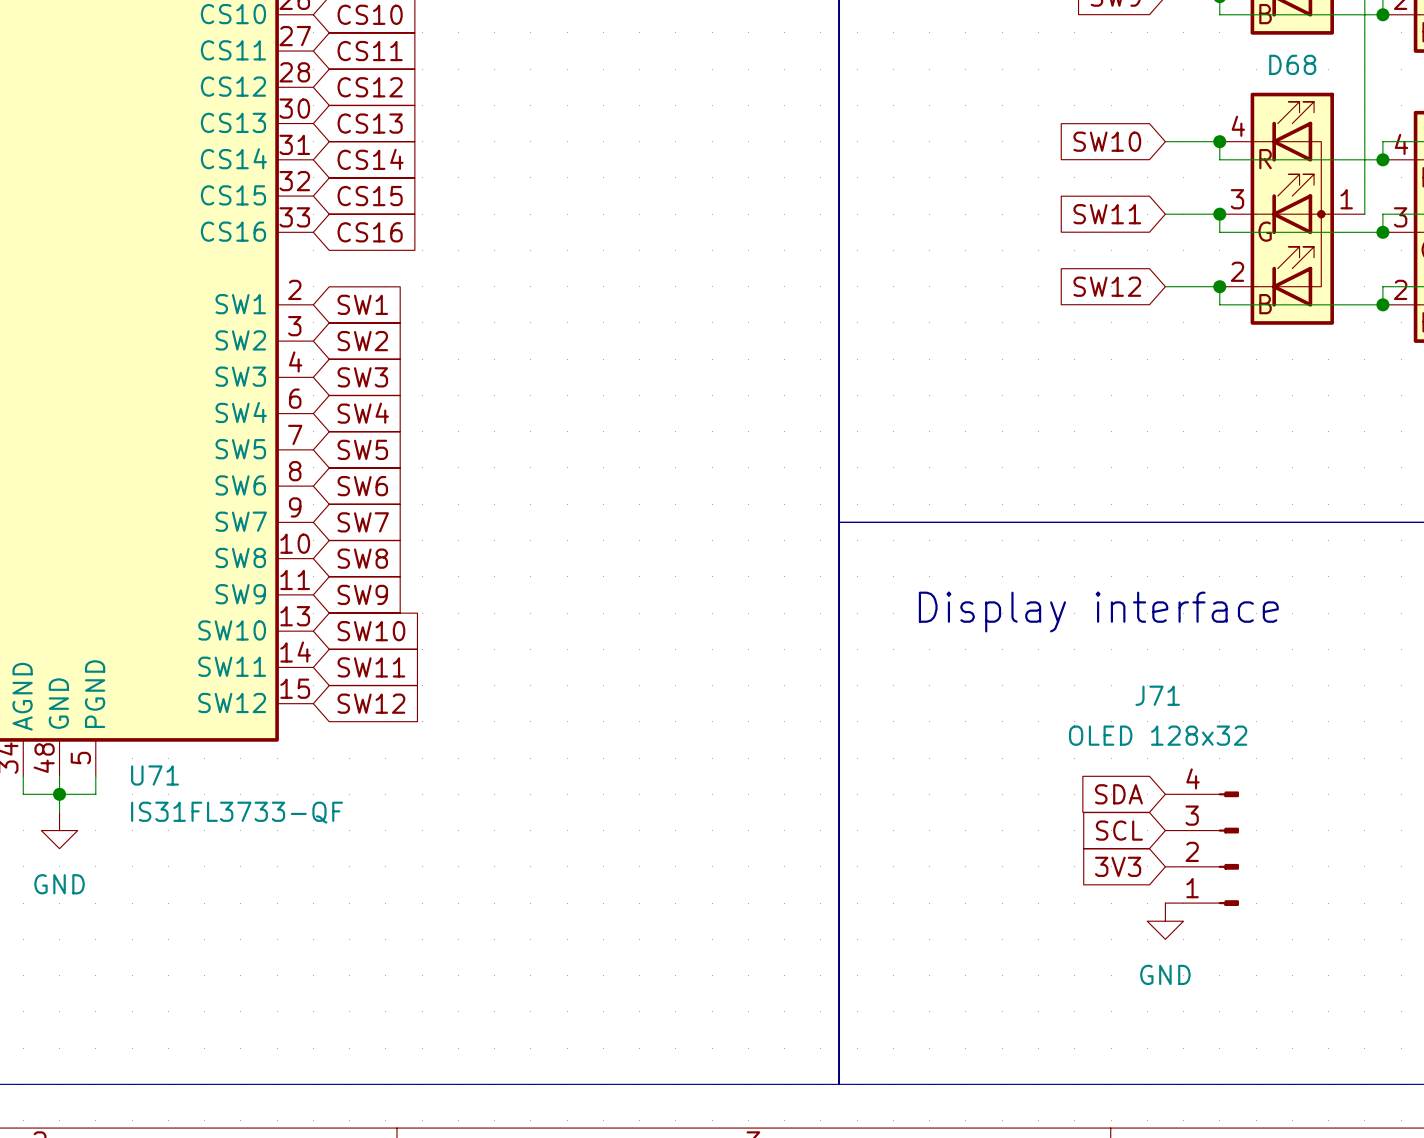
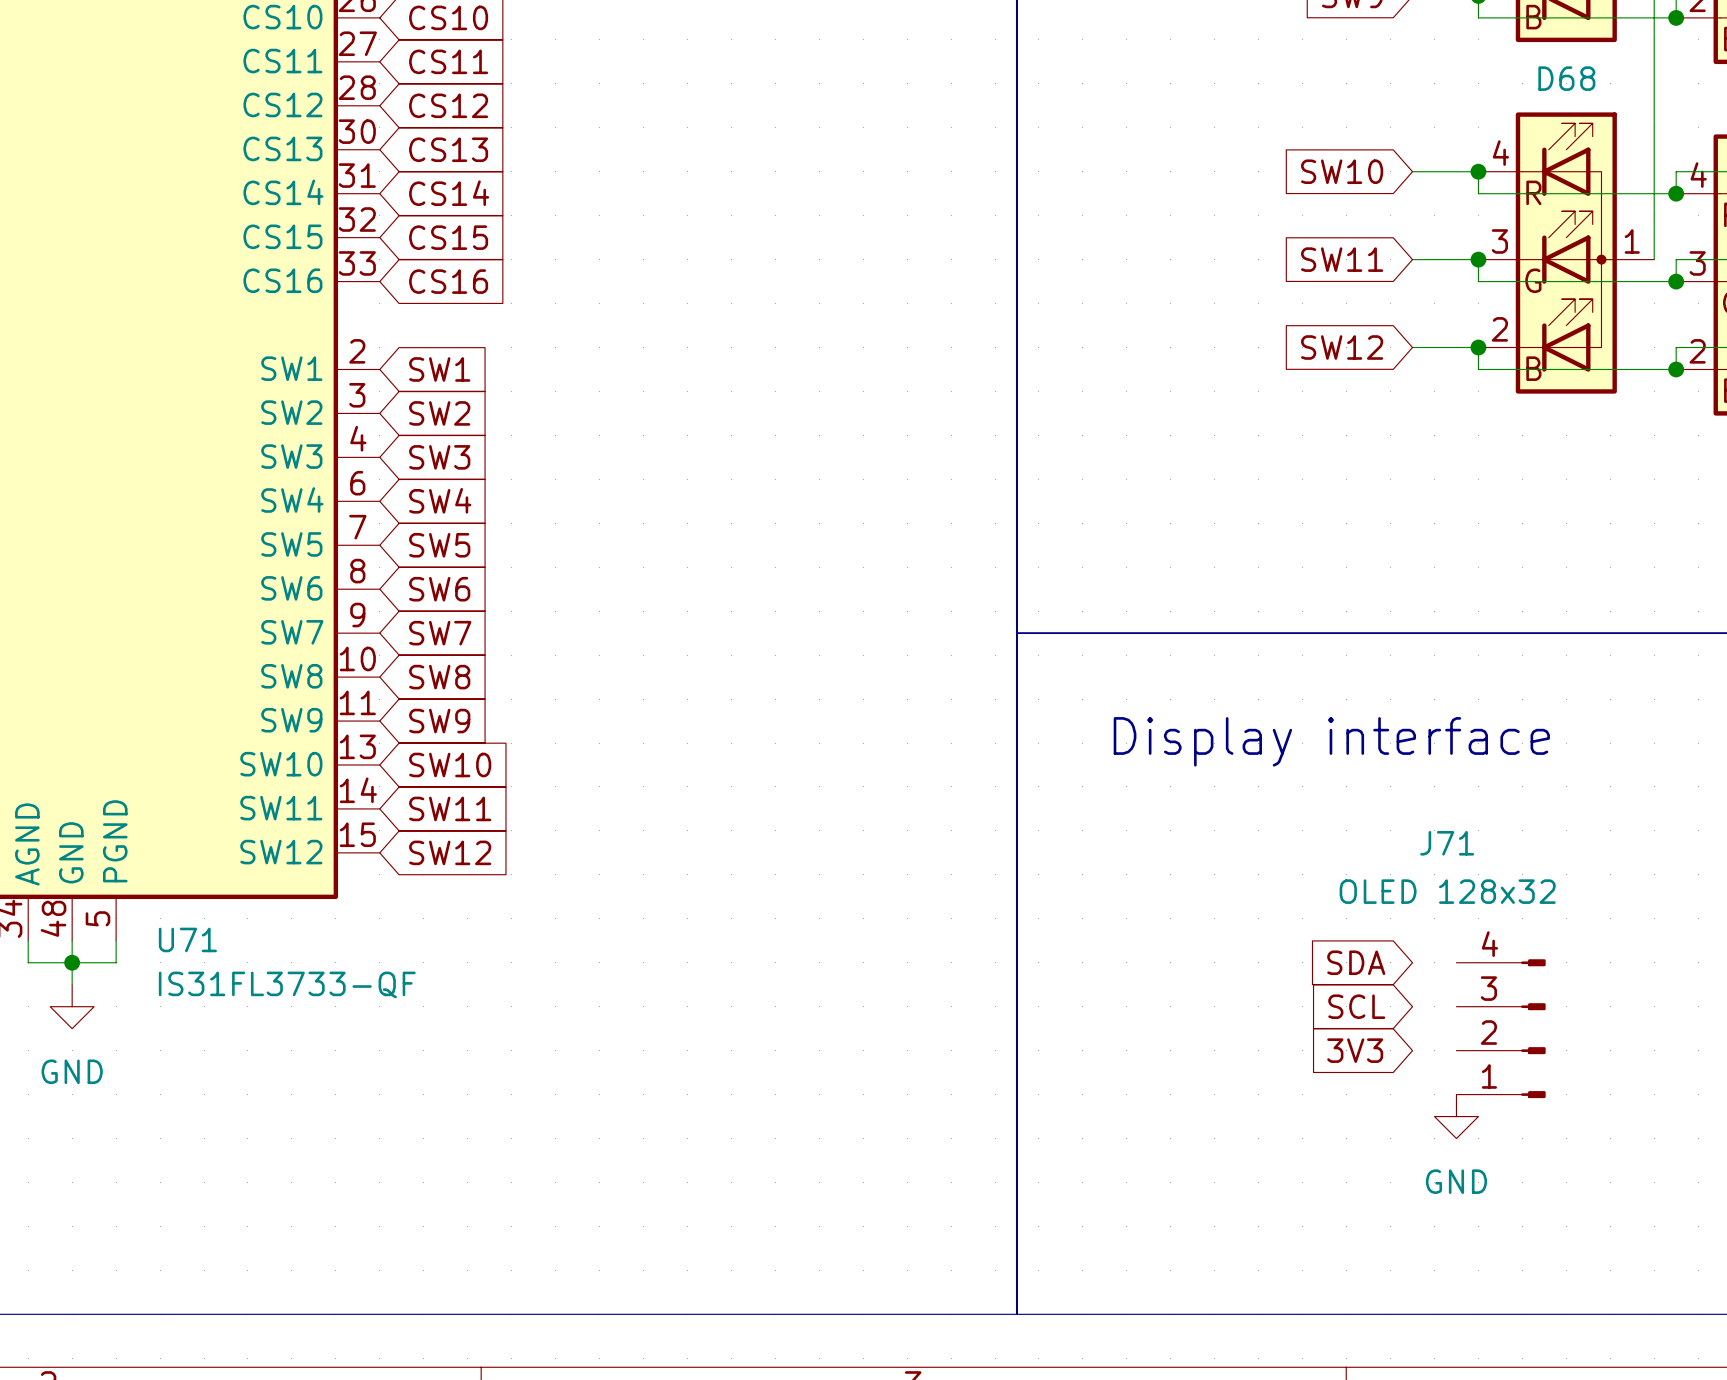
J71 position: (1202, 848) -> (1501, 1028)
power symbol position: GND (1165, 921) -> GND (1456, 1116)

